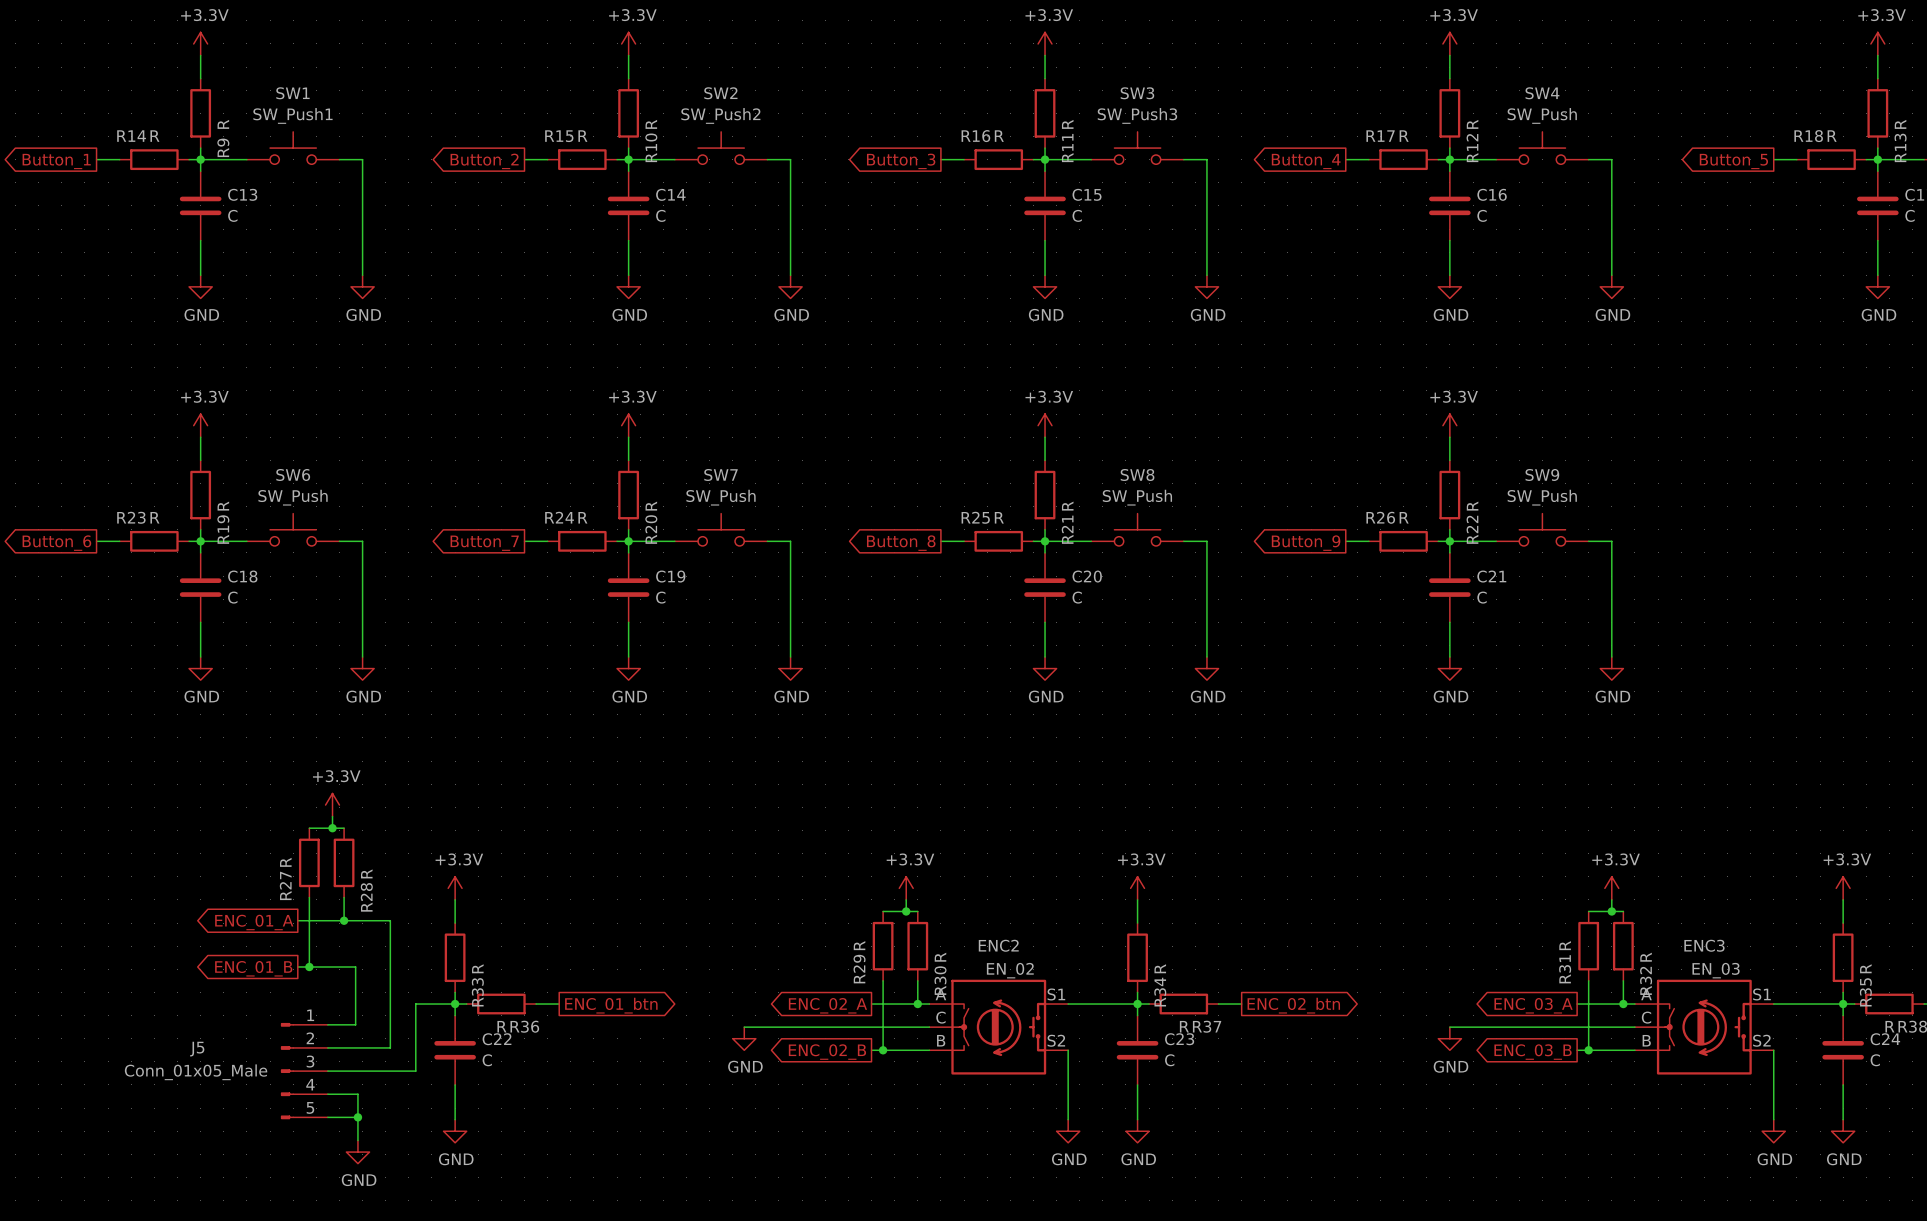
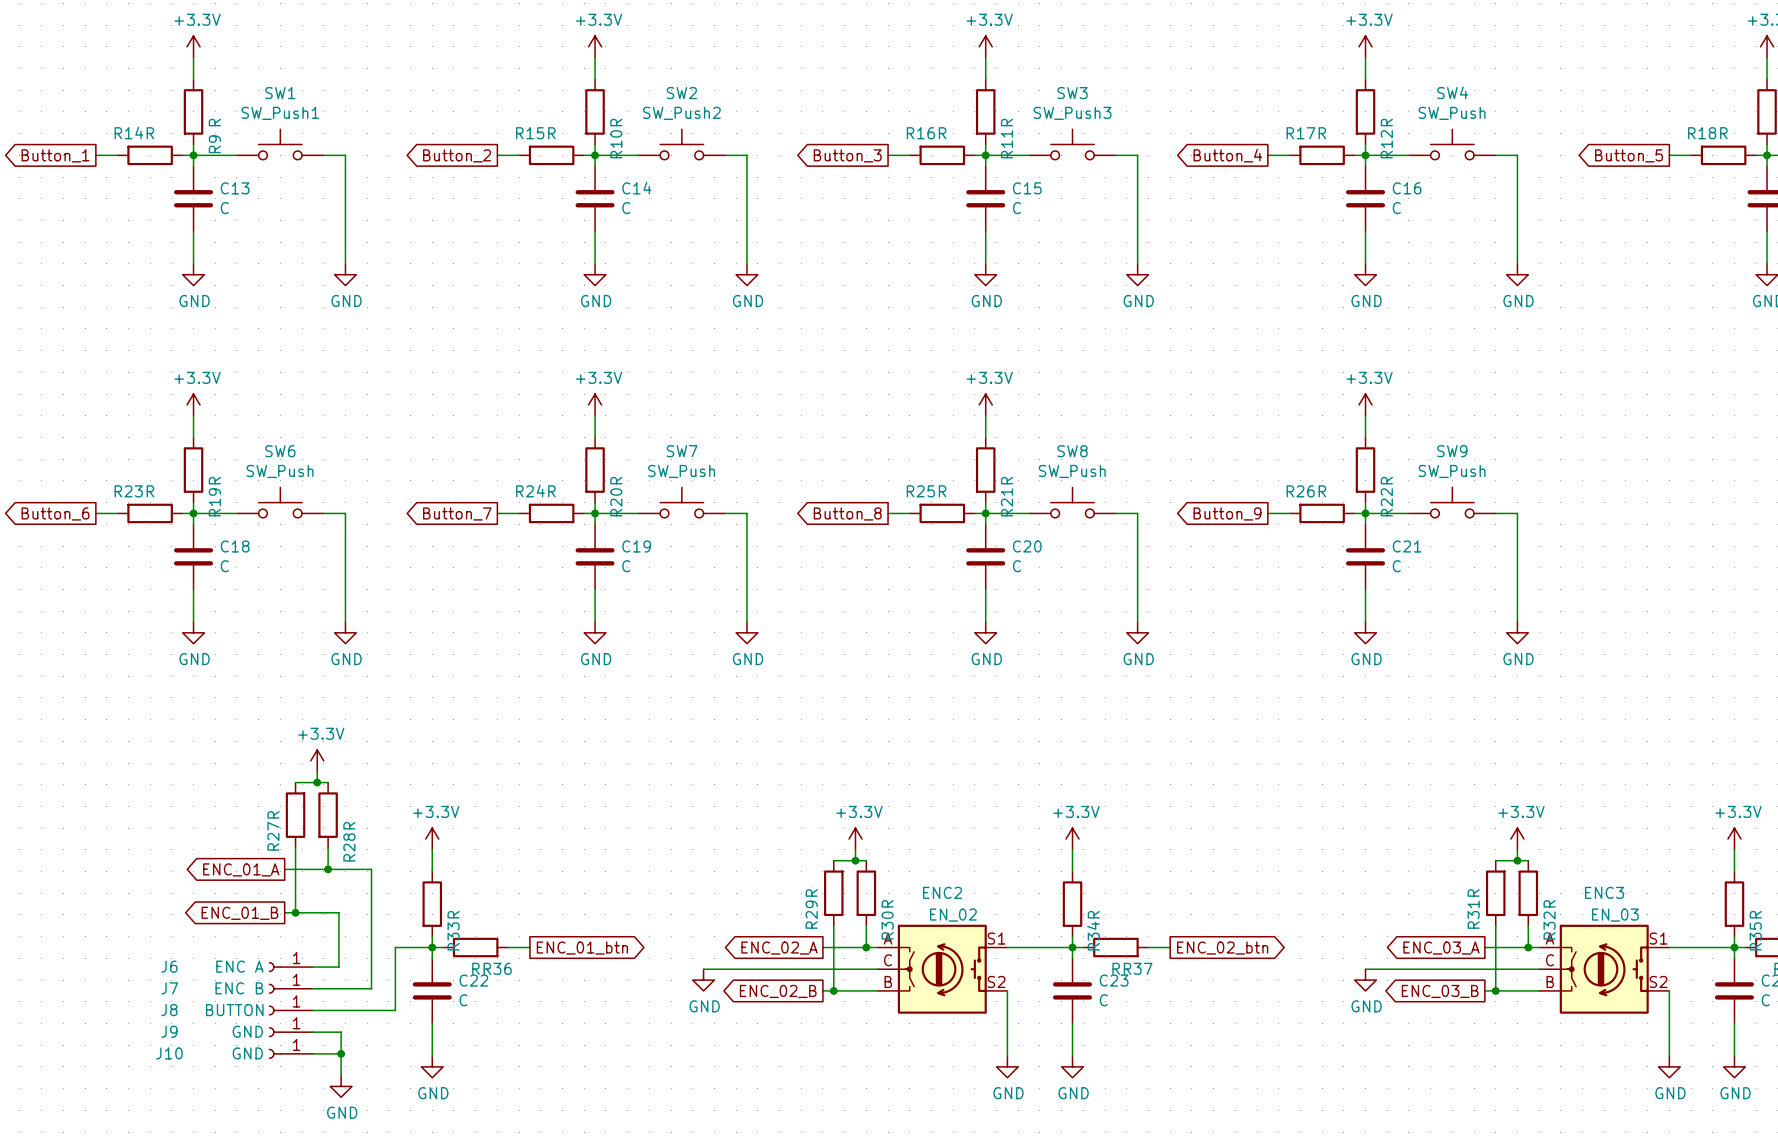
J6: none -> ENC A (290, 967)
J7: none -> ENC B (290, 988)
J5: Conn_01x05_Male (304, 1071) -> none
J8: none -> BUTTON (290, 1010)
J9: none -> GND (290, 1032)
J10: none -> GND (290, 1053)

